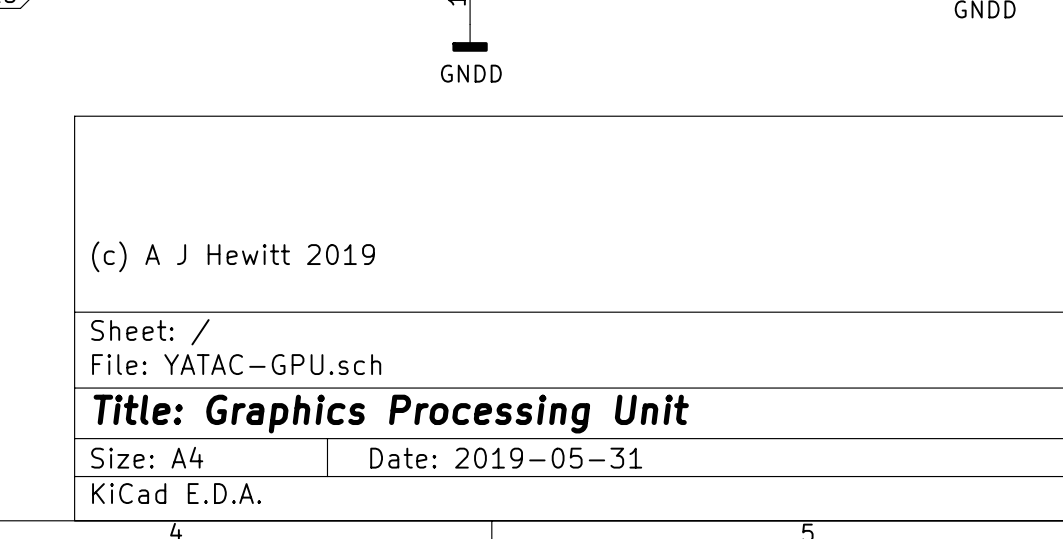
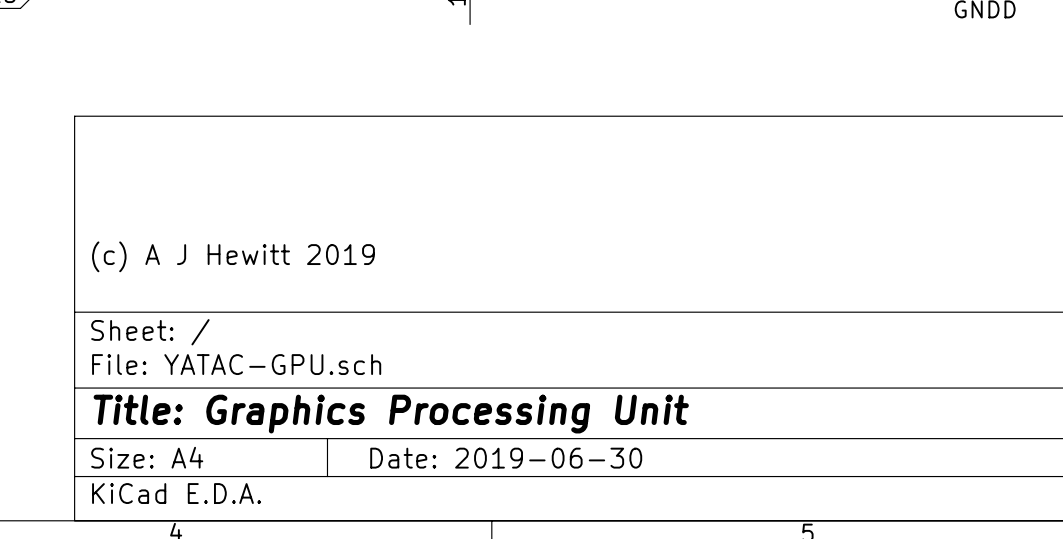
power symbol: GNDD (470, 38) -> none
title block: Date: 2019-05-31 (506, 458) -> Date: 2019-06-30 (506, 458)

